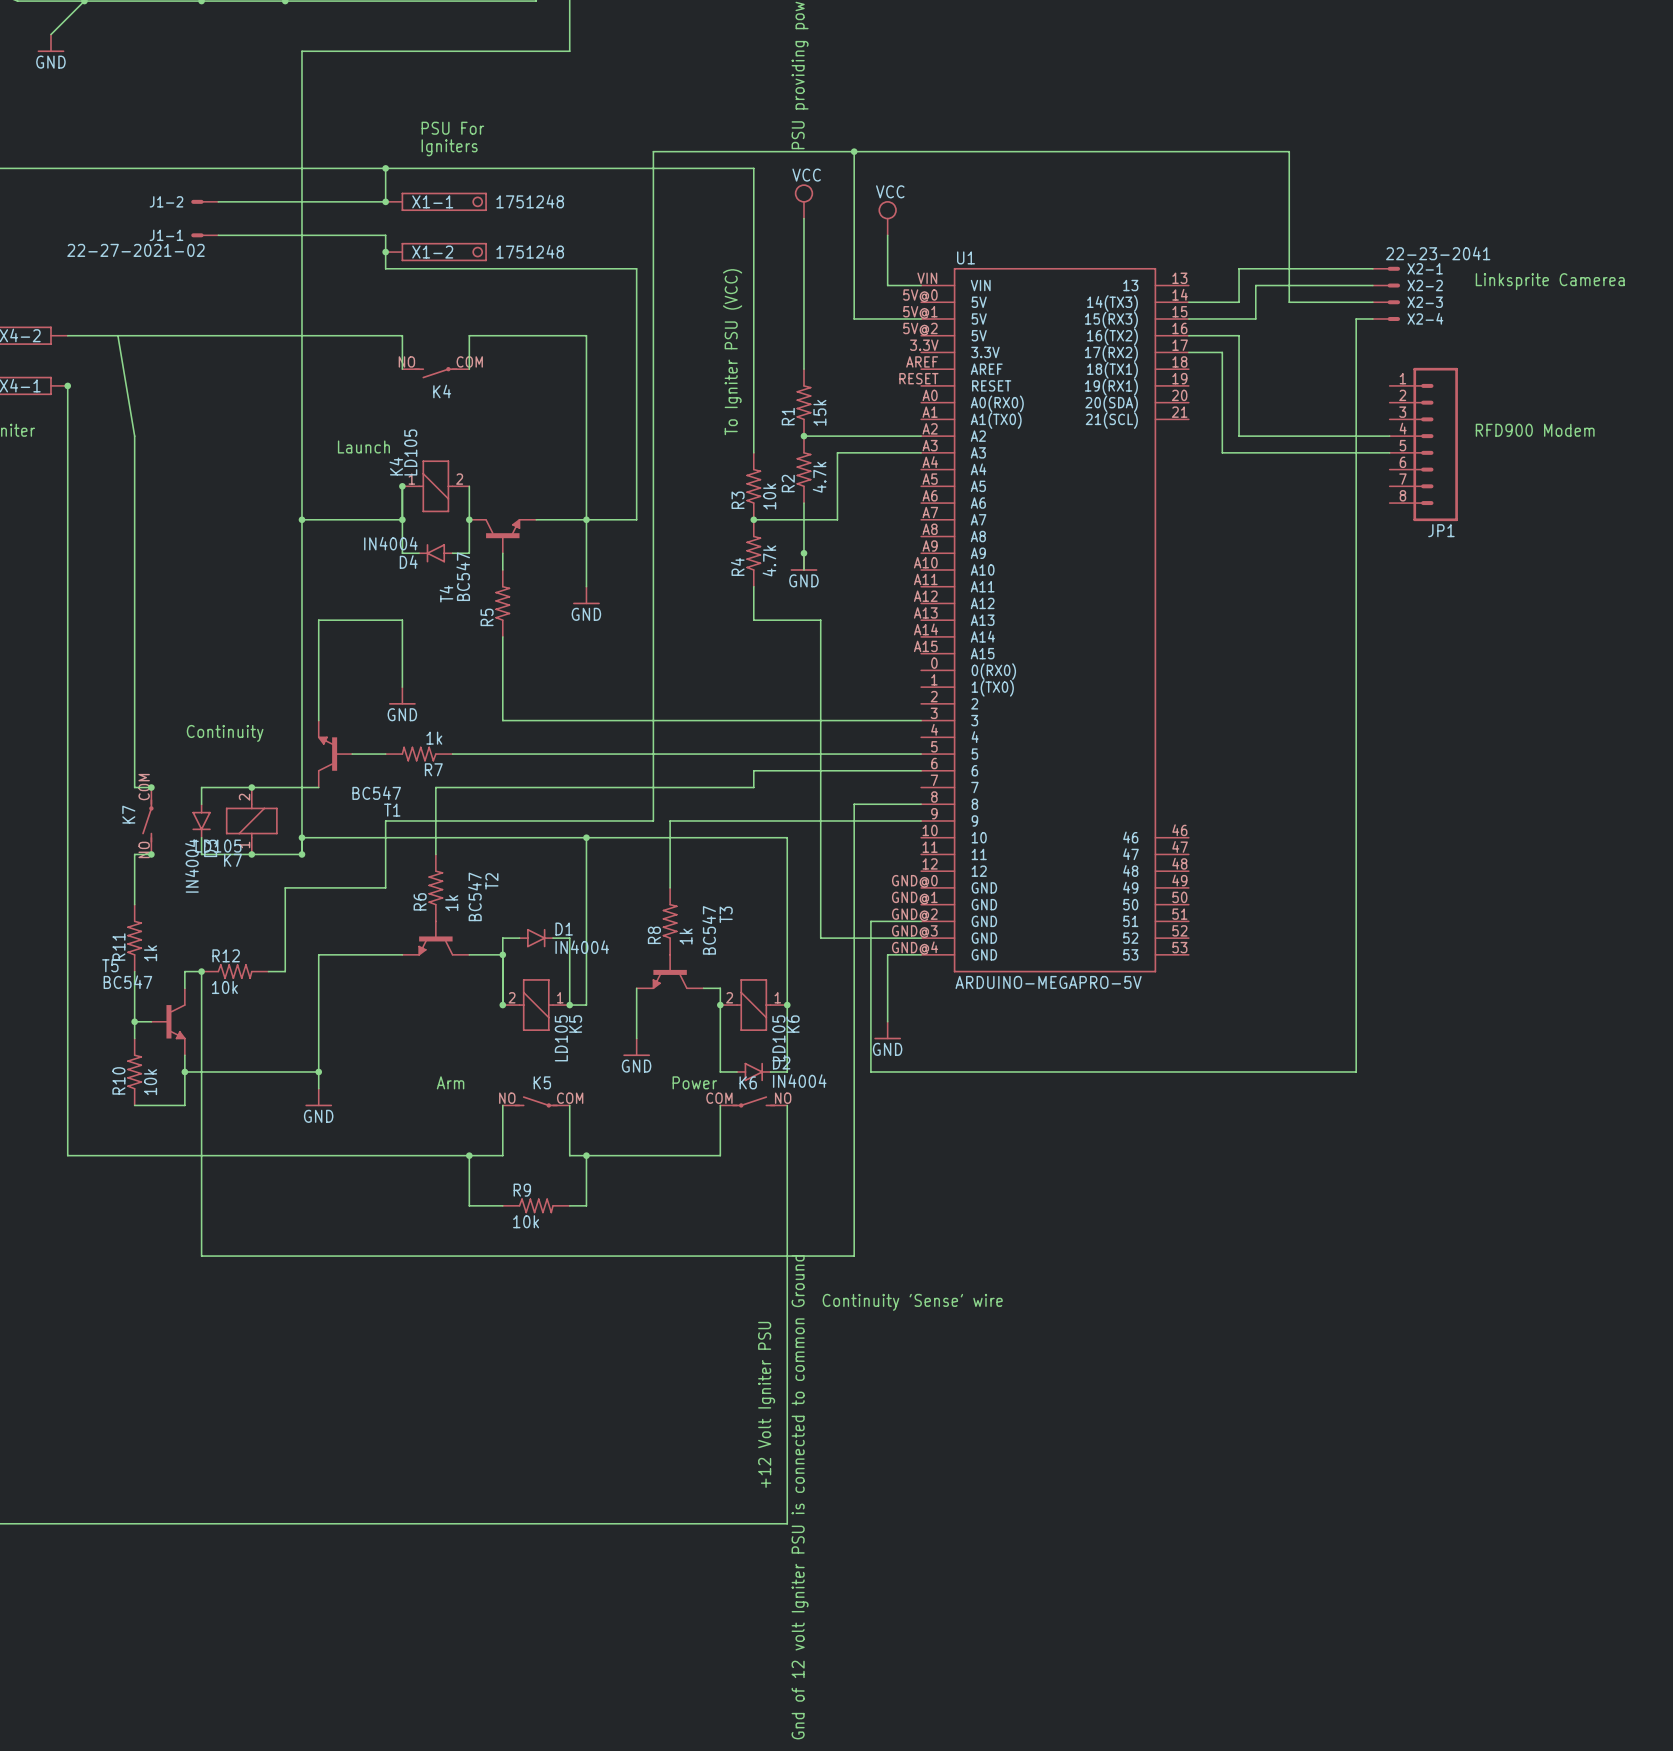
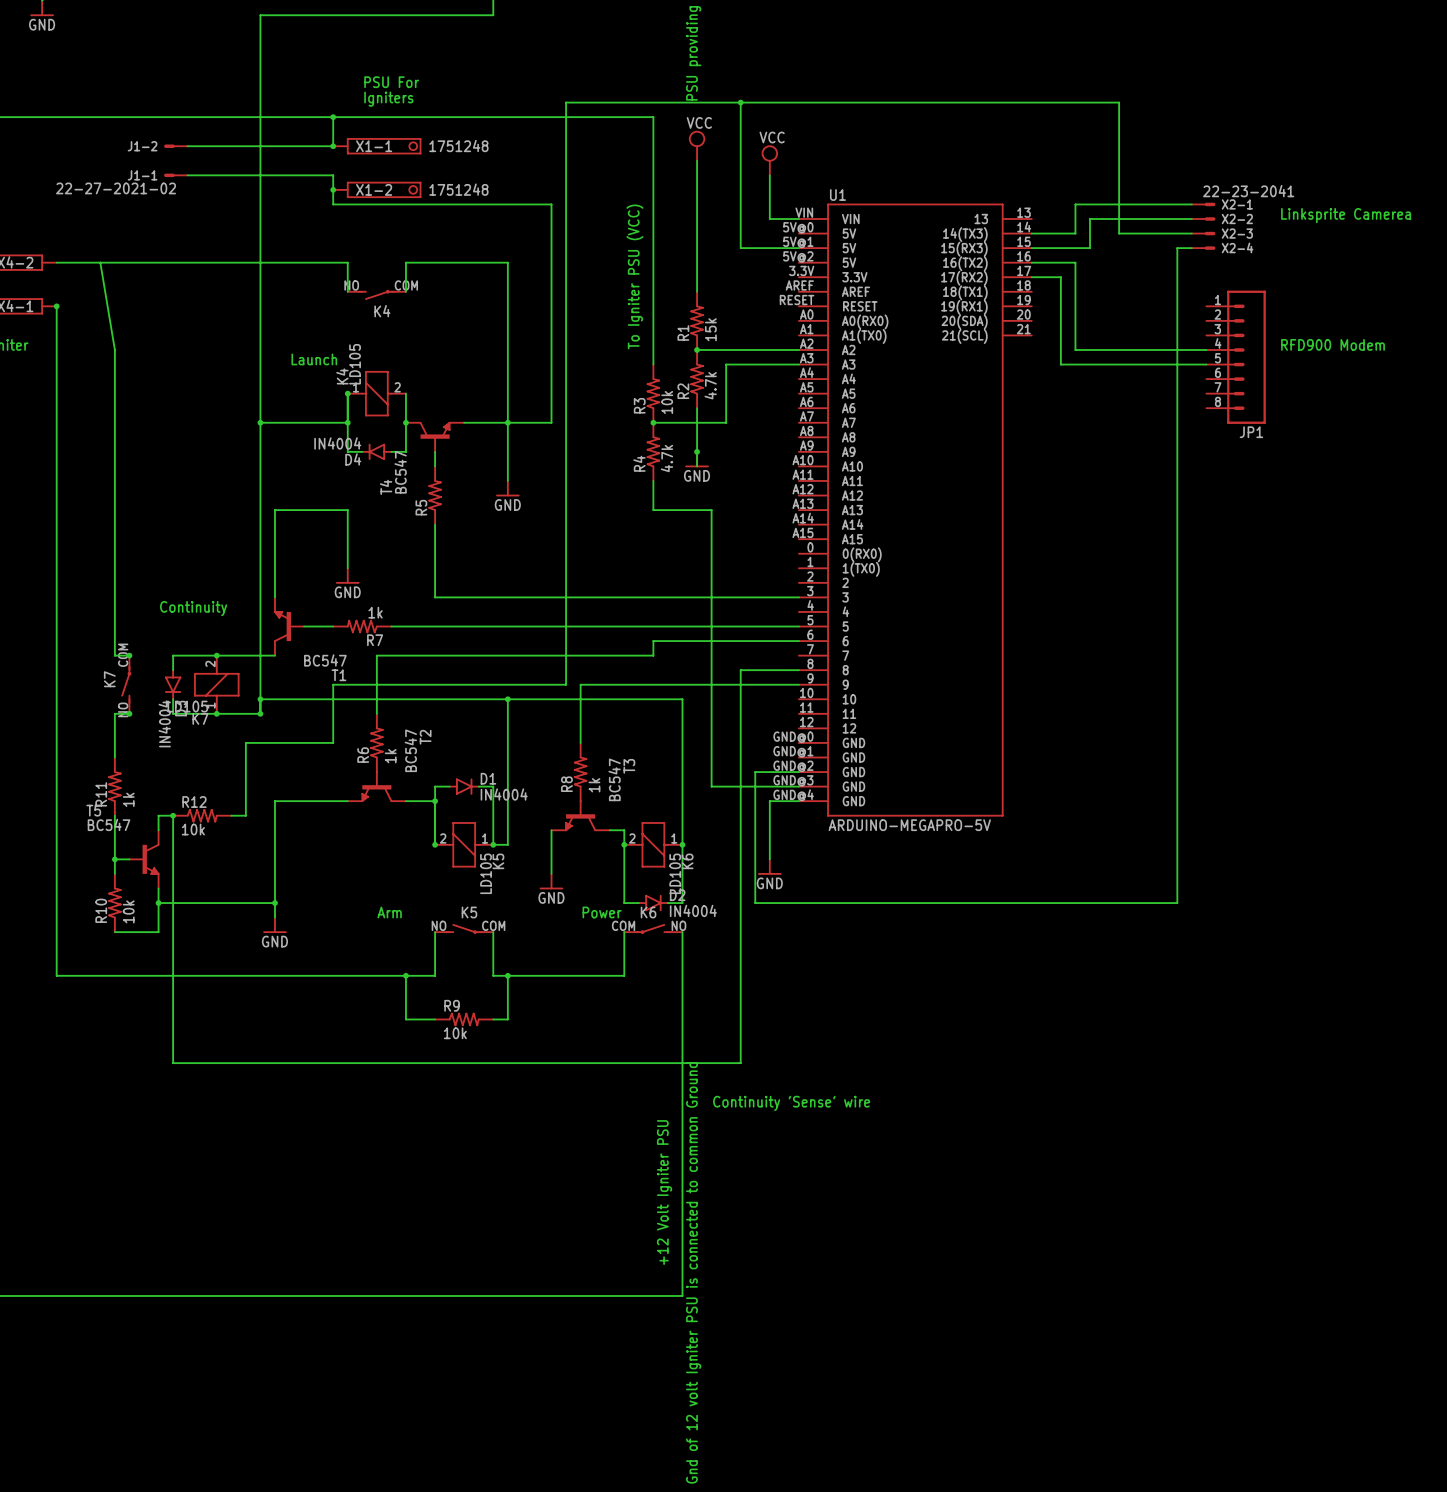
U1 symbol: [921, 267, 1189, 973] -> [798, 203, 1032, 817]

